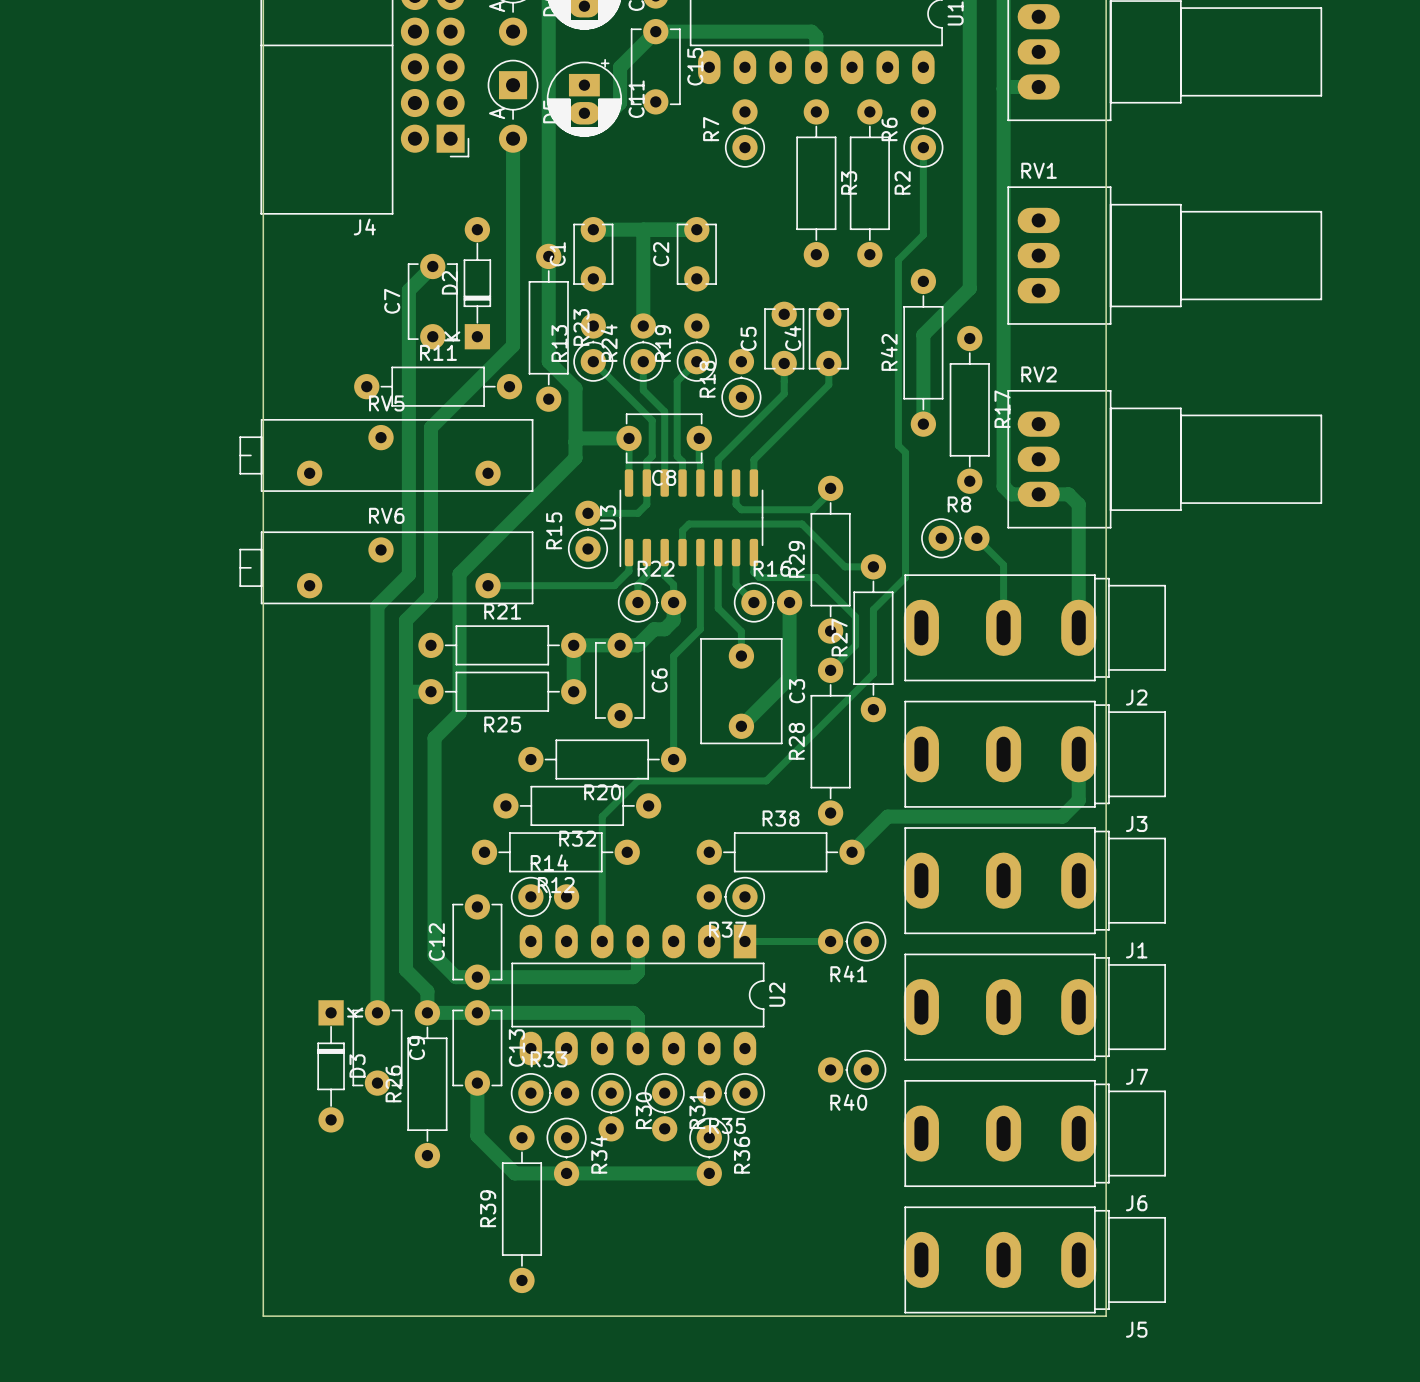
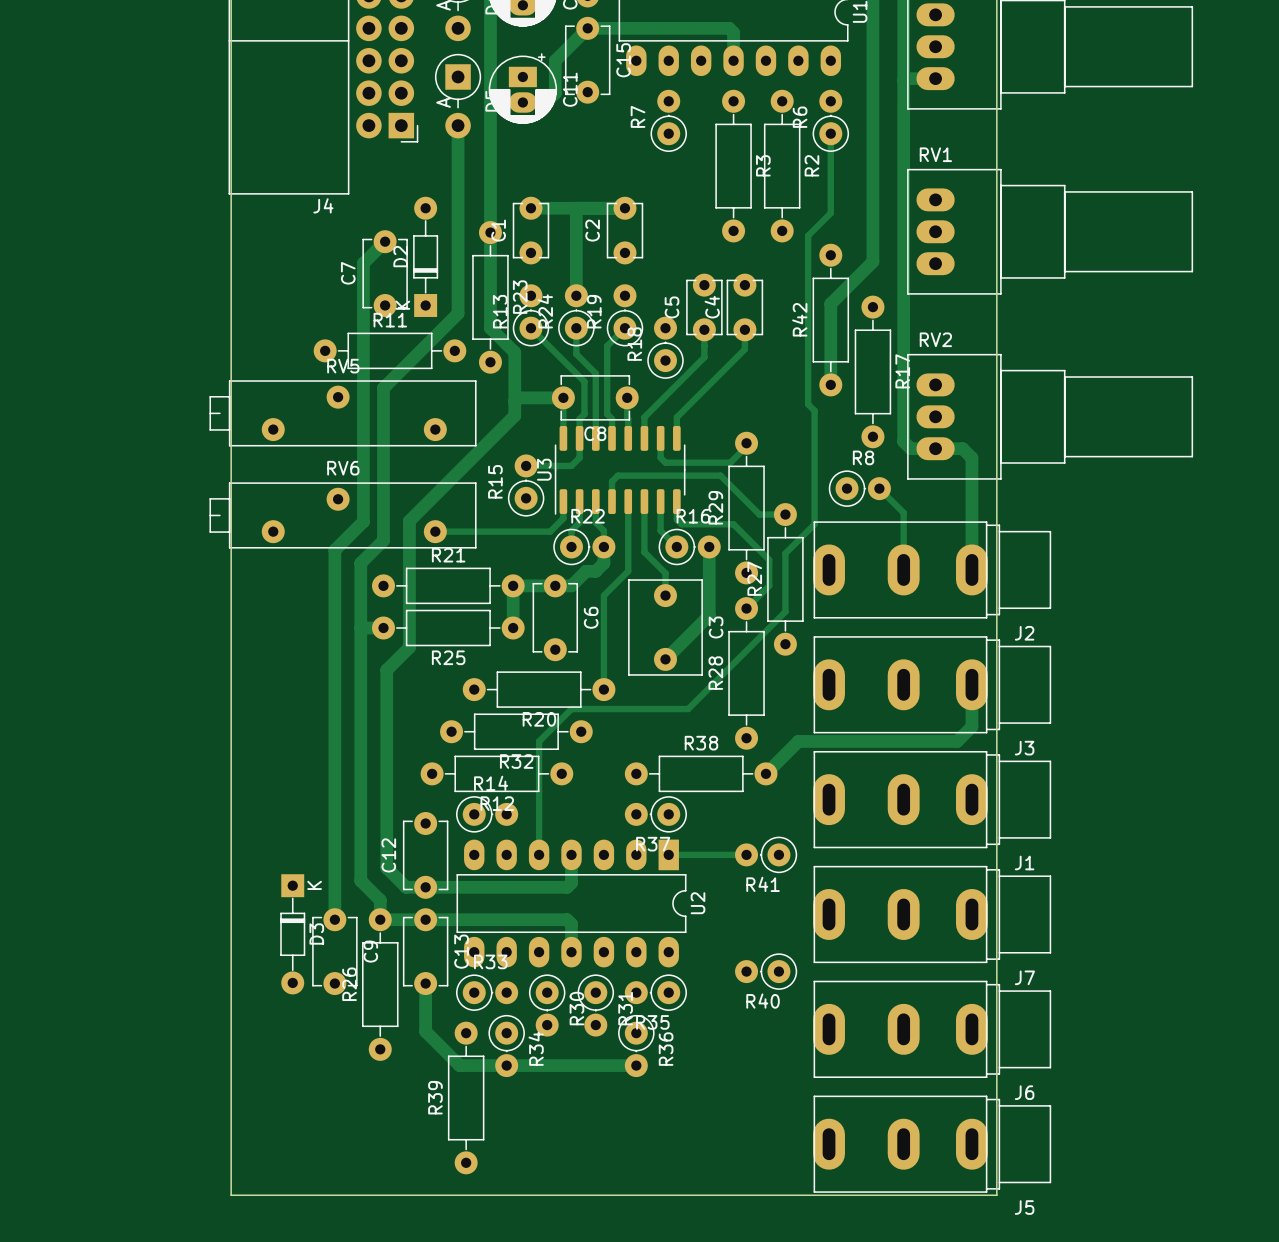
D3 position: (331, 1066) -> (292, 934)

